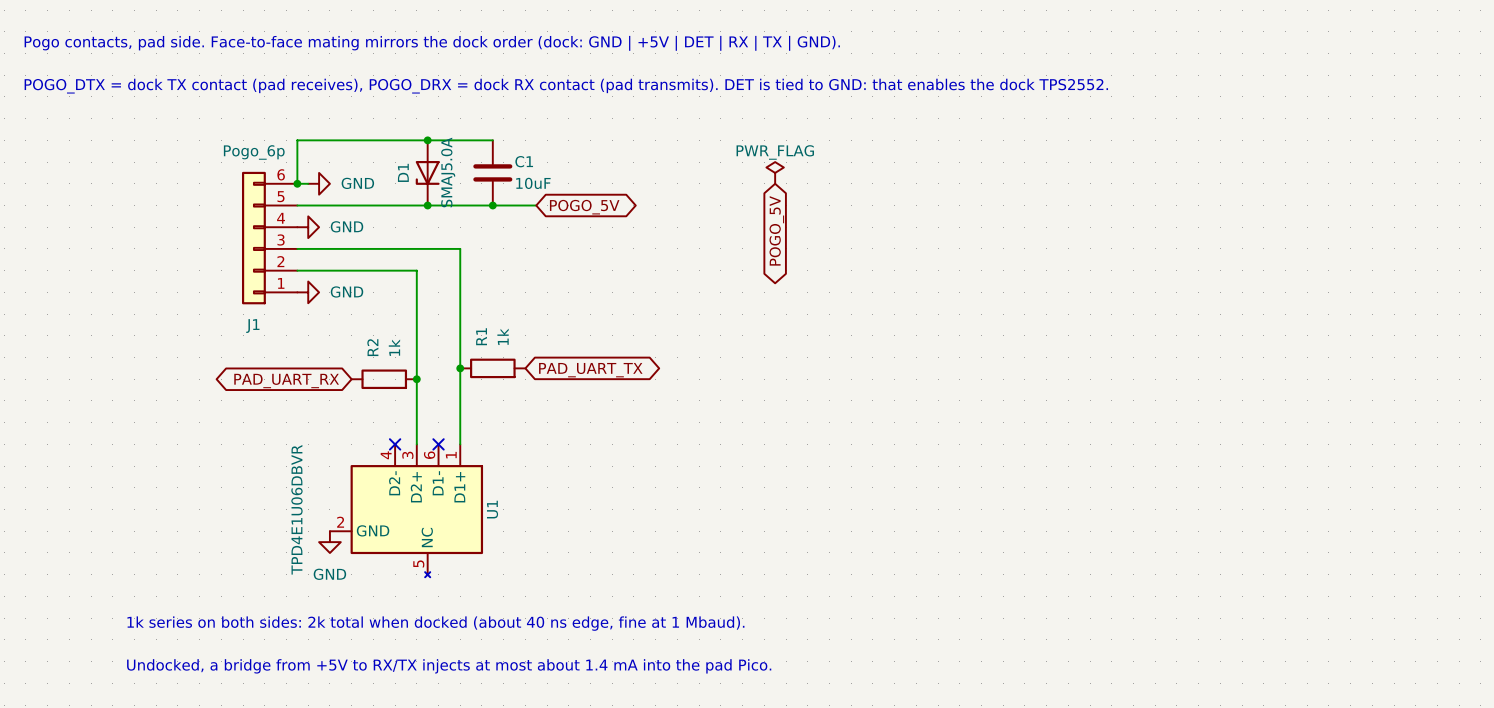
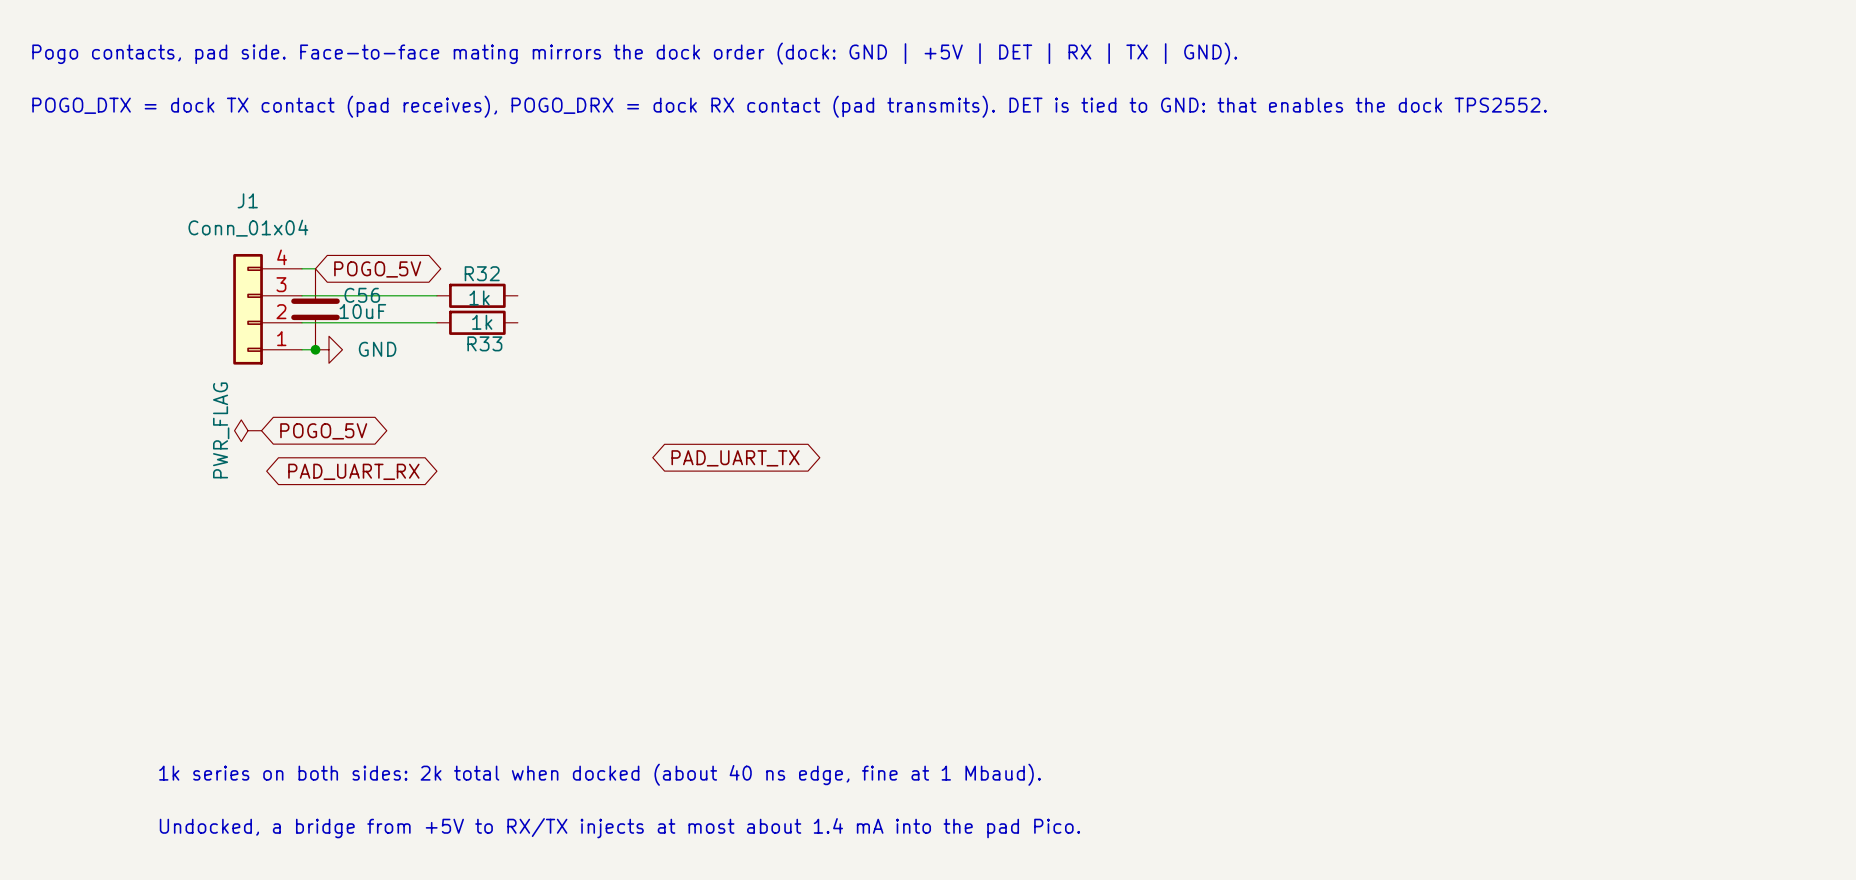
junction: (427, 140) -> none
wire: (492, 140) (297, 140) (297, 183) (308, 183) -> none
J1 value: Pogo_6p (254, 152) -> Conn_01x04 (248, 228)
J1 symbol: [241, 171, 298, 305] -> [233, 253, 303, 365]
D1: SMAJ5.0A (427, 172) -> none
C1: 10uF (492, 172) -> none
power symbol: PWR_FLAG (775, 172) -> none
junction: (297, 183) -> none
power symbol: GND (319, 183) -> none
wire: (297, 205) (536, 205) -> none
junction: (427, 205) -> none
junction: (492, 205) -> none
global label: POGO_5V (584, 207) -> none
global label: none -> POGO_5V (377, 269)
power symbol: GND (308, 227) -> none
global label: POGO_5V (776, 230) -> none
wire: none -> (302, 295) (436, 295)
R32: none -> 1k (477, 295)
C56: none -> 10uF (315, 309)
wire: (297, 248) (460, 248) (460, 444) -> none
wire: none -> (302, 322) (436, 322)
R33: none -> 1k (477, 322)
wire: (297, 270) (416, 270) (416, 444) -> none
junction: none -> (315, 349)
power symbol: none -> GND (328, 349)
power symbol: GND (308, 292) -> none
J1 name position: J1 (252, 326) -> J1 (247, 200)
power symbol: none -> PWR_FLAG (248, 430)
global label: none -> POGO_5V (323, 431)
junction: (460, 368) -> none
R1: 1k (492, 368) -> none
R2: 1k (384, 379) -> none
junction: (416, 379) -> none
no-connect mark: (395, 444) -> none
no-connect mark: (438, 444) -> none
U1: TPD4E1U06DBVR (406, 510) -> none
power symbol: GND (329, 542) -> none

